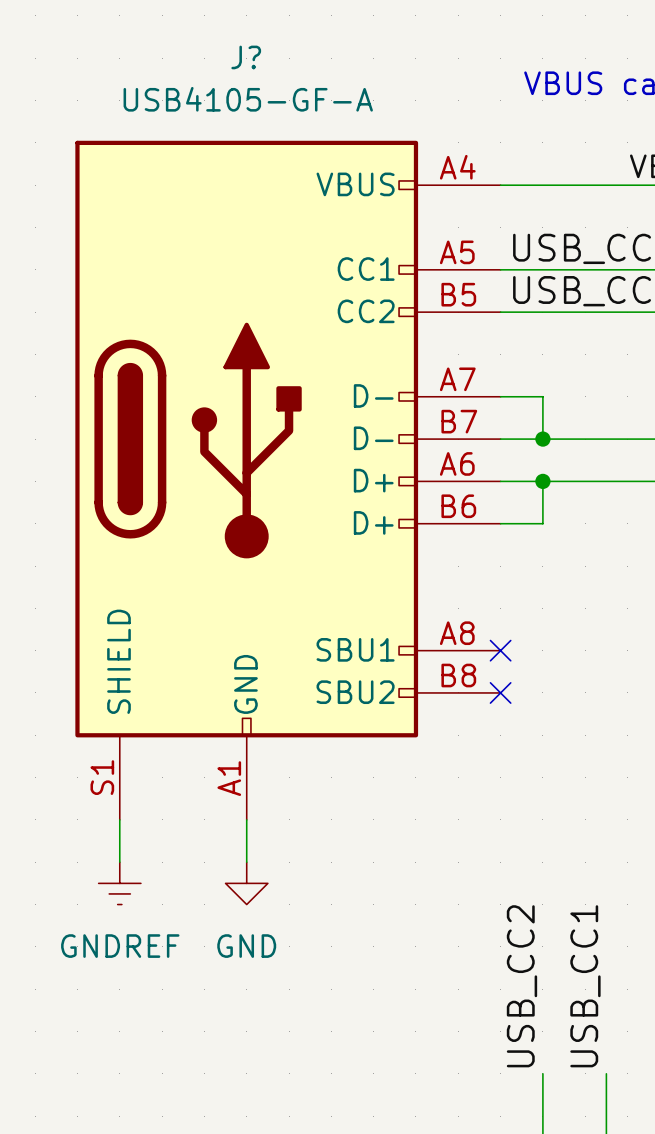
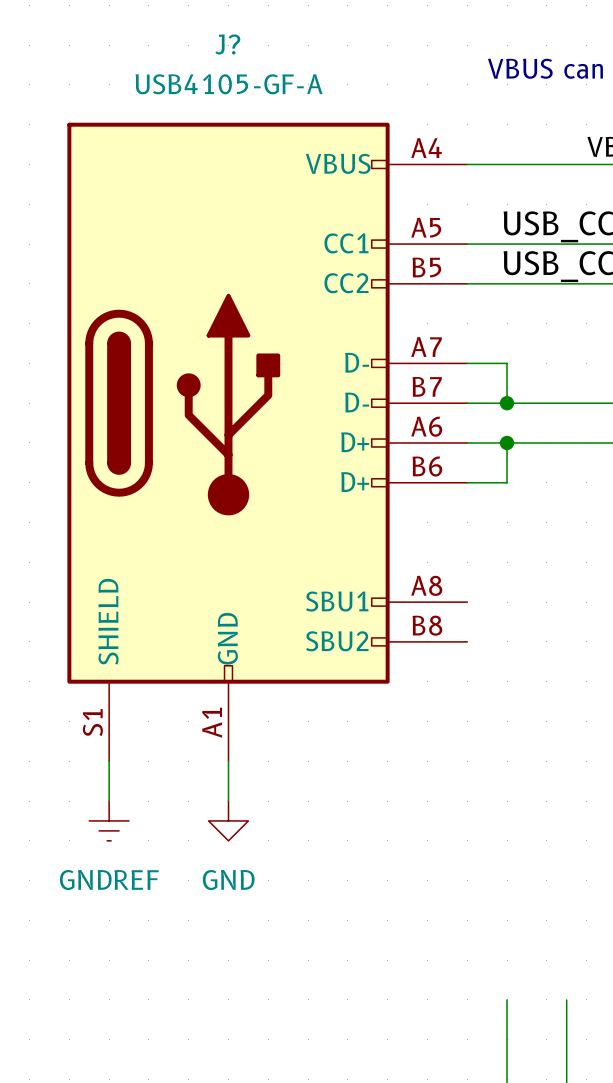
no-connect mark: (500, 650) -> none
no-connect mark: (500, 692) -> none
label: USB_CC2 (521, 986) -> none
label: USB_CC1 (585, 986) -> none

